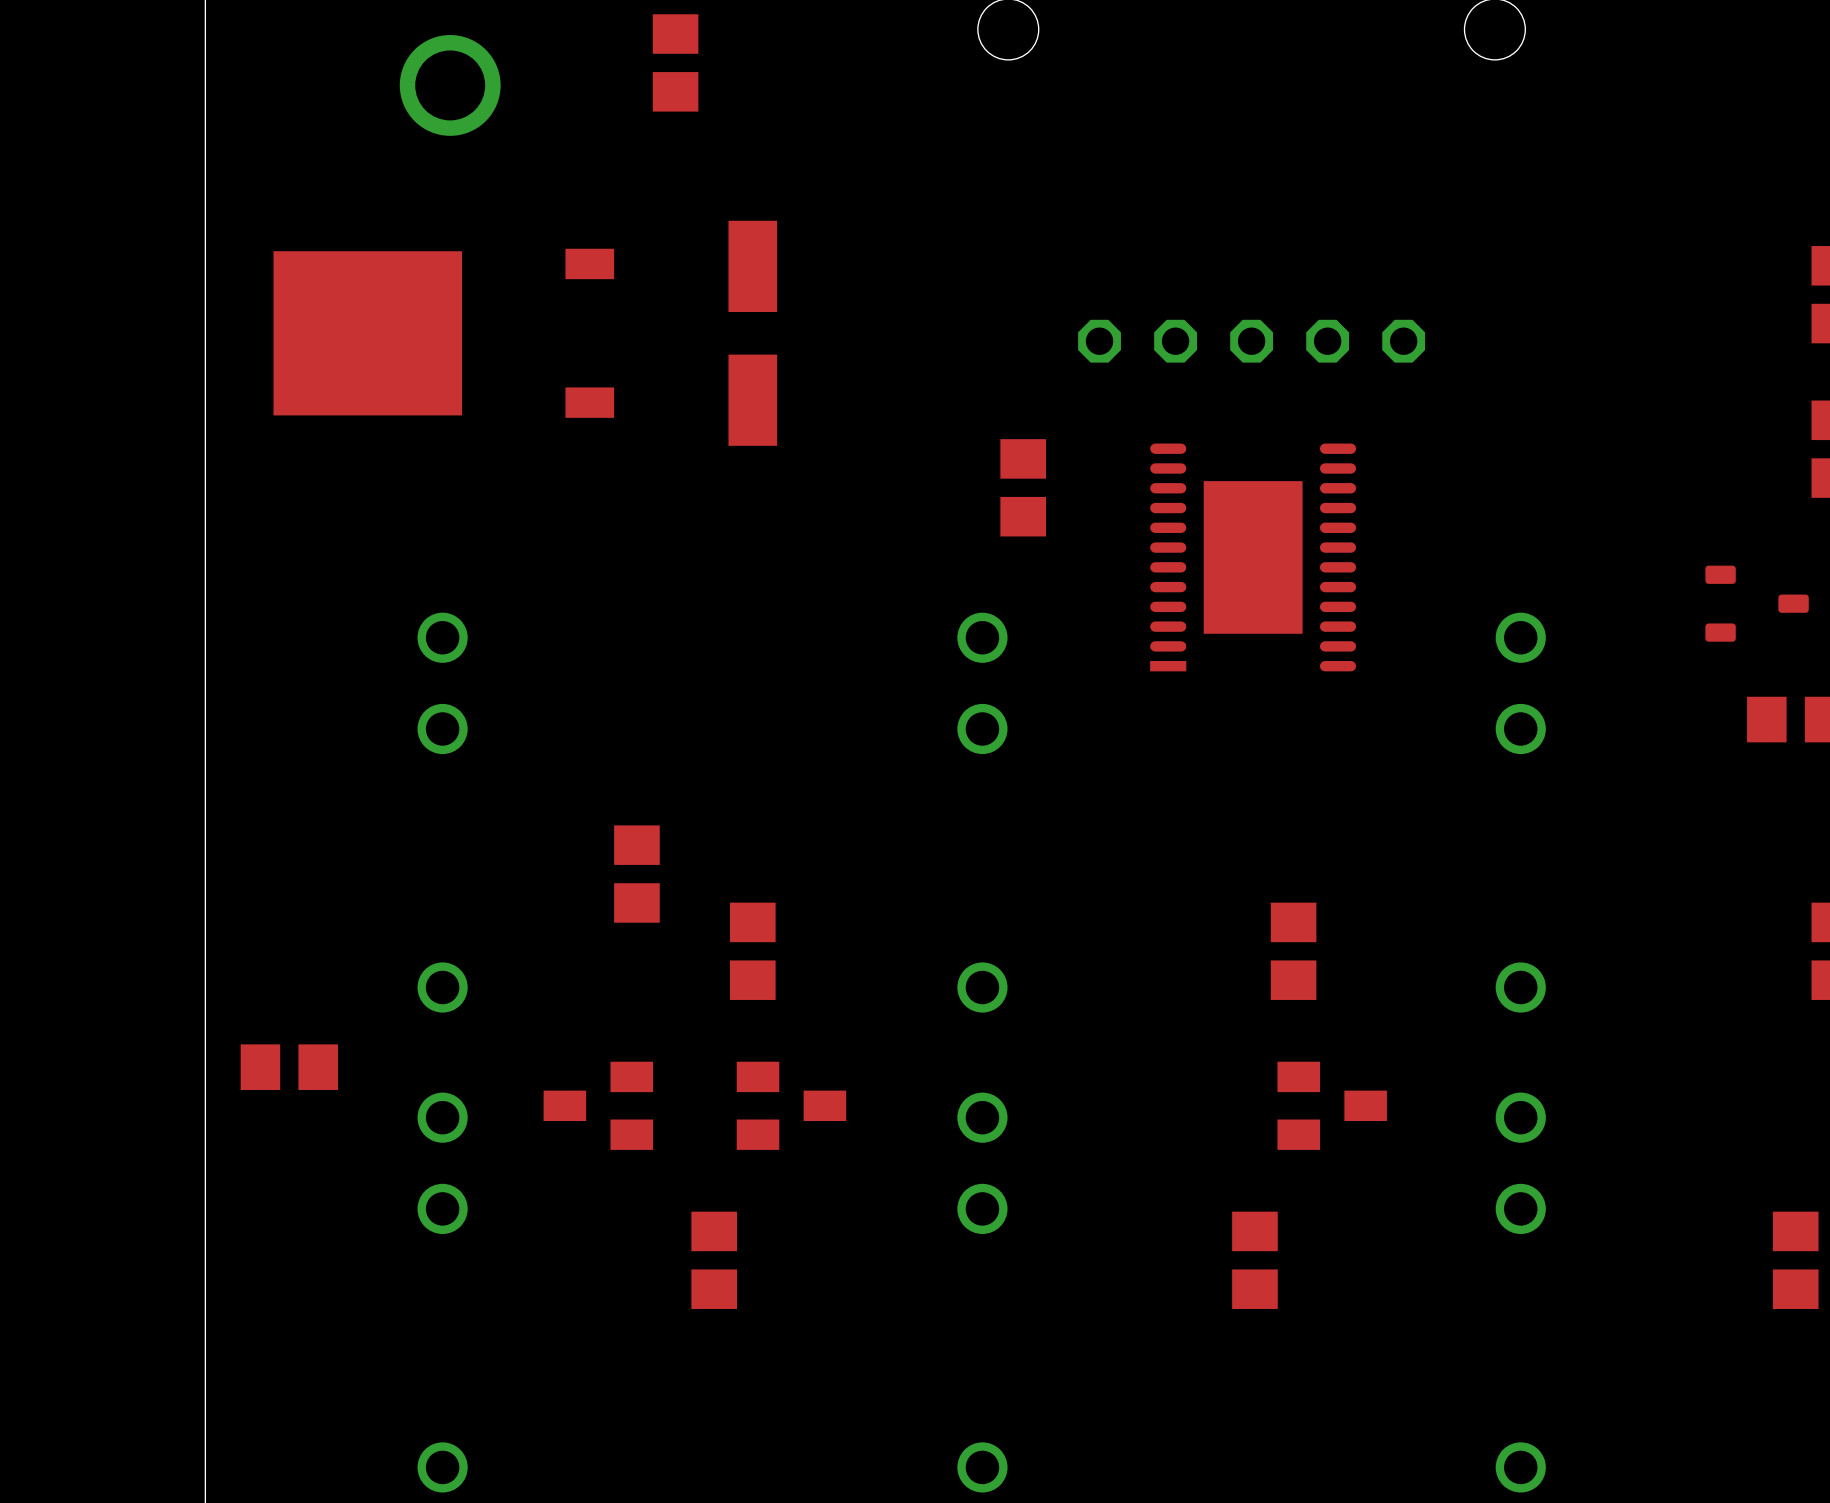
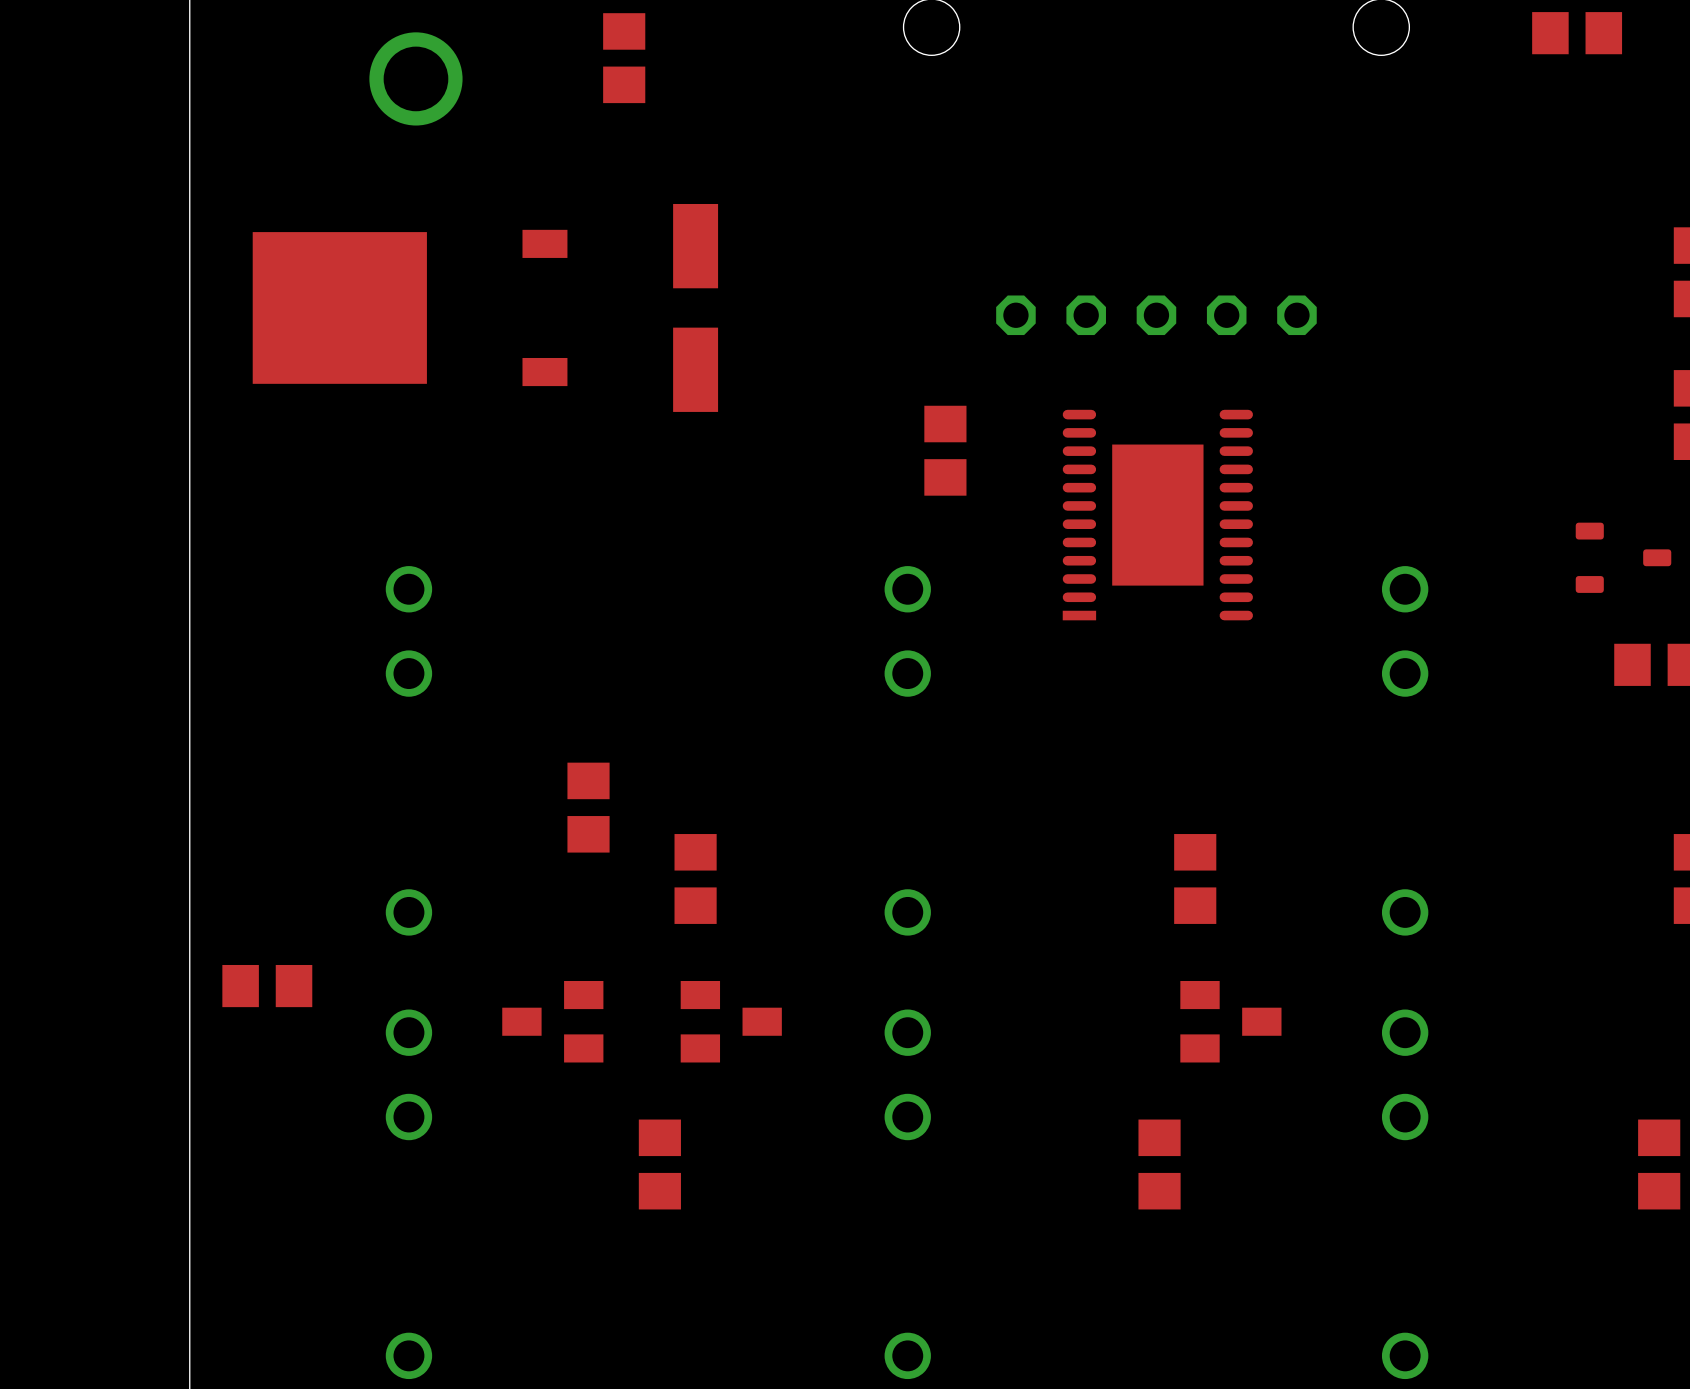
part: none -> (1577, 33)

